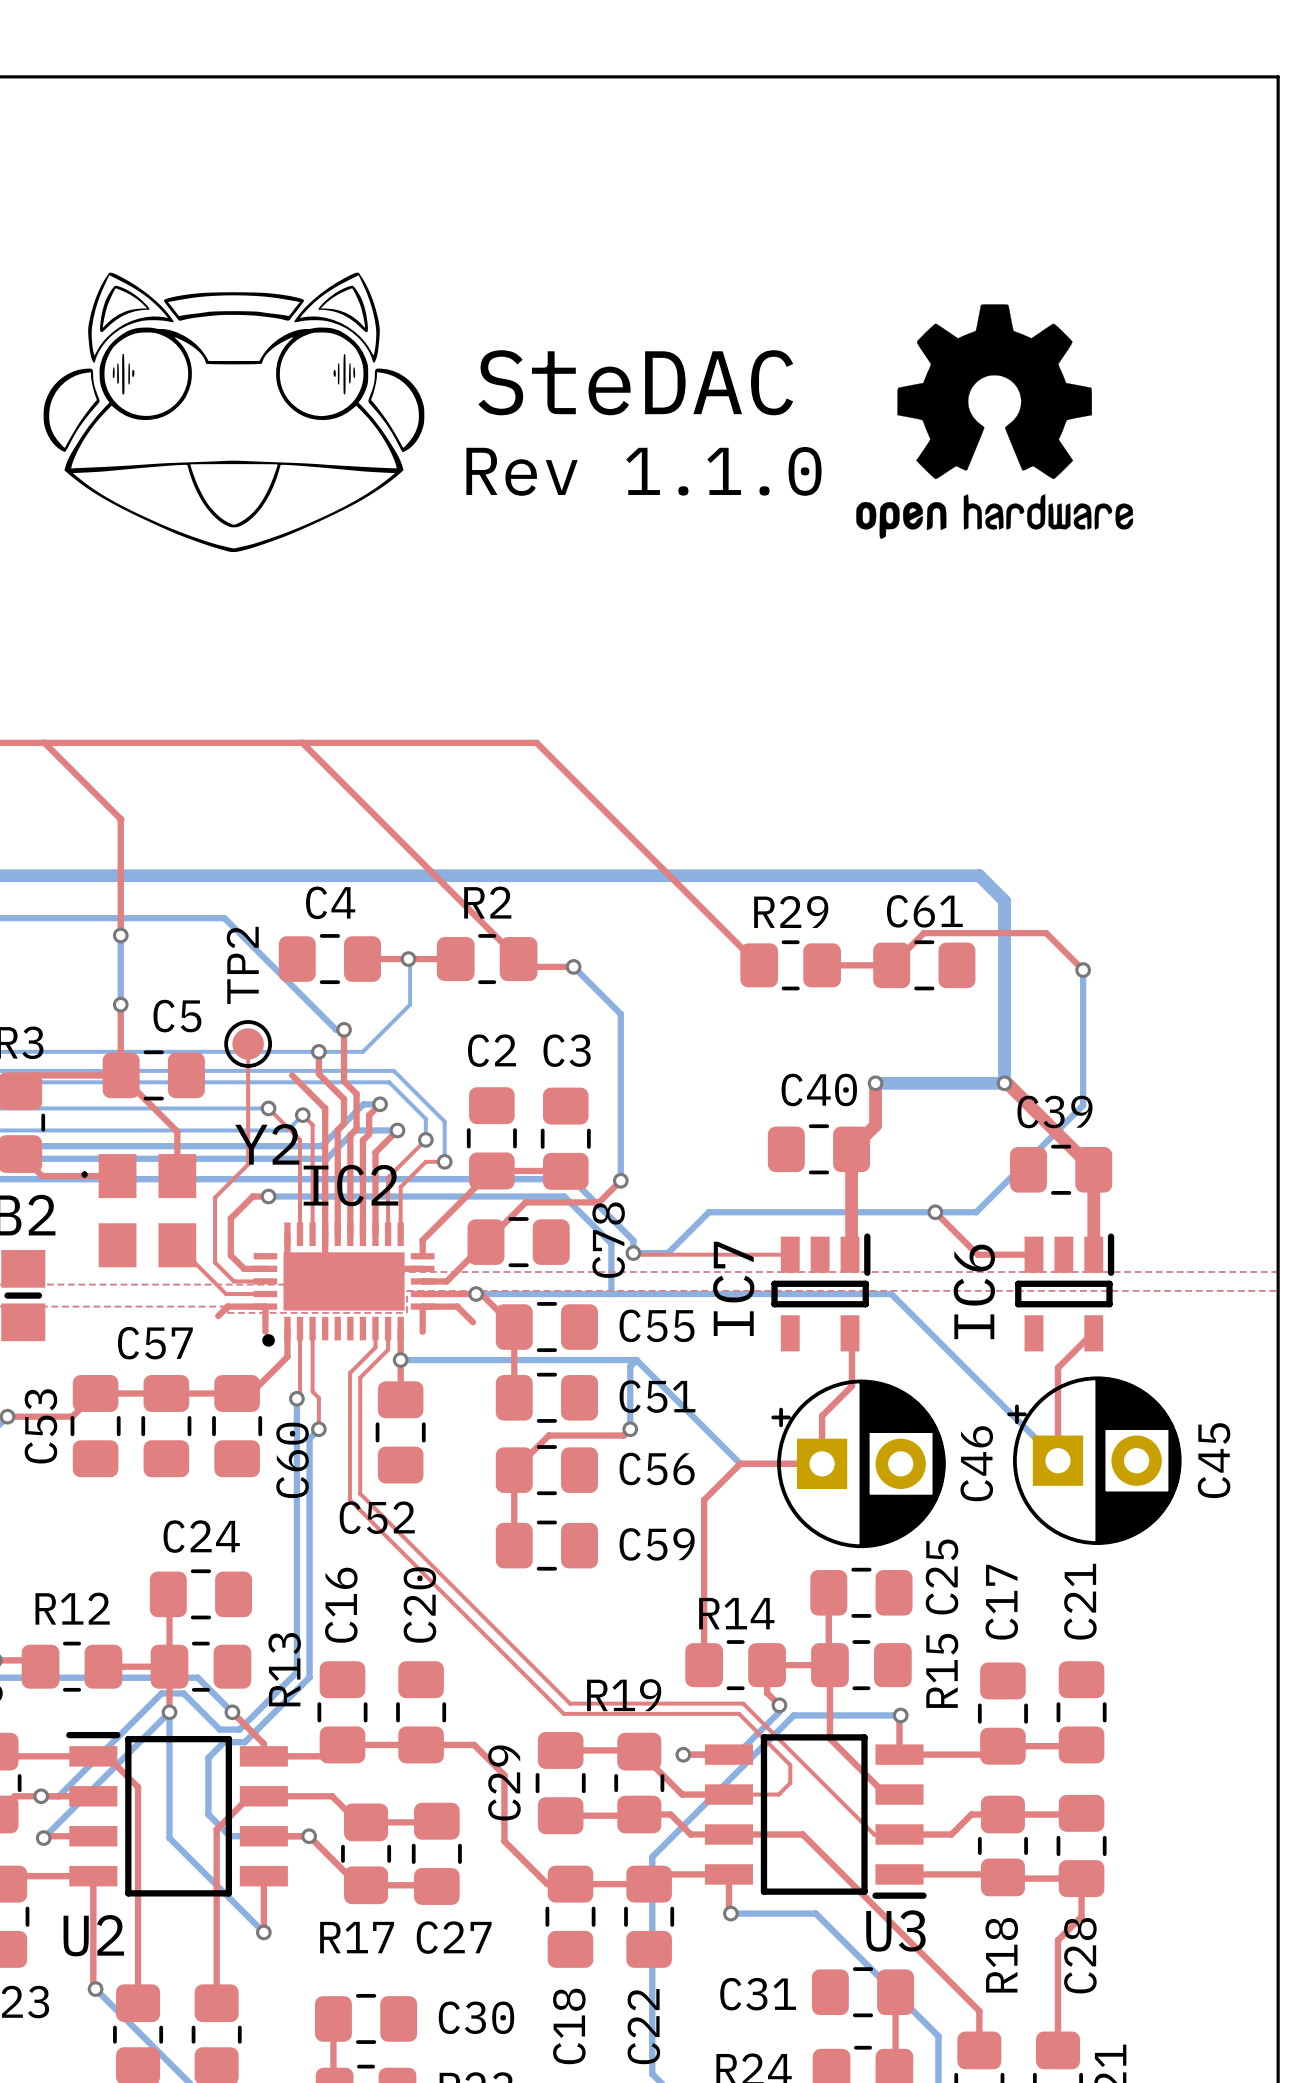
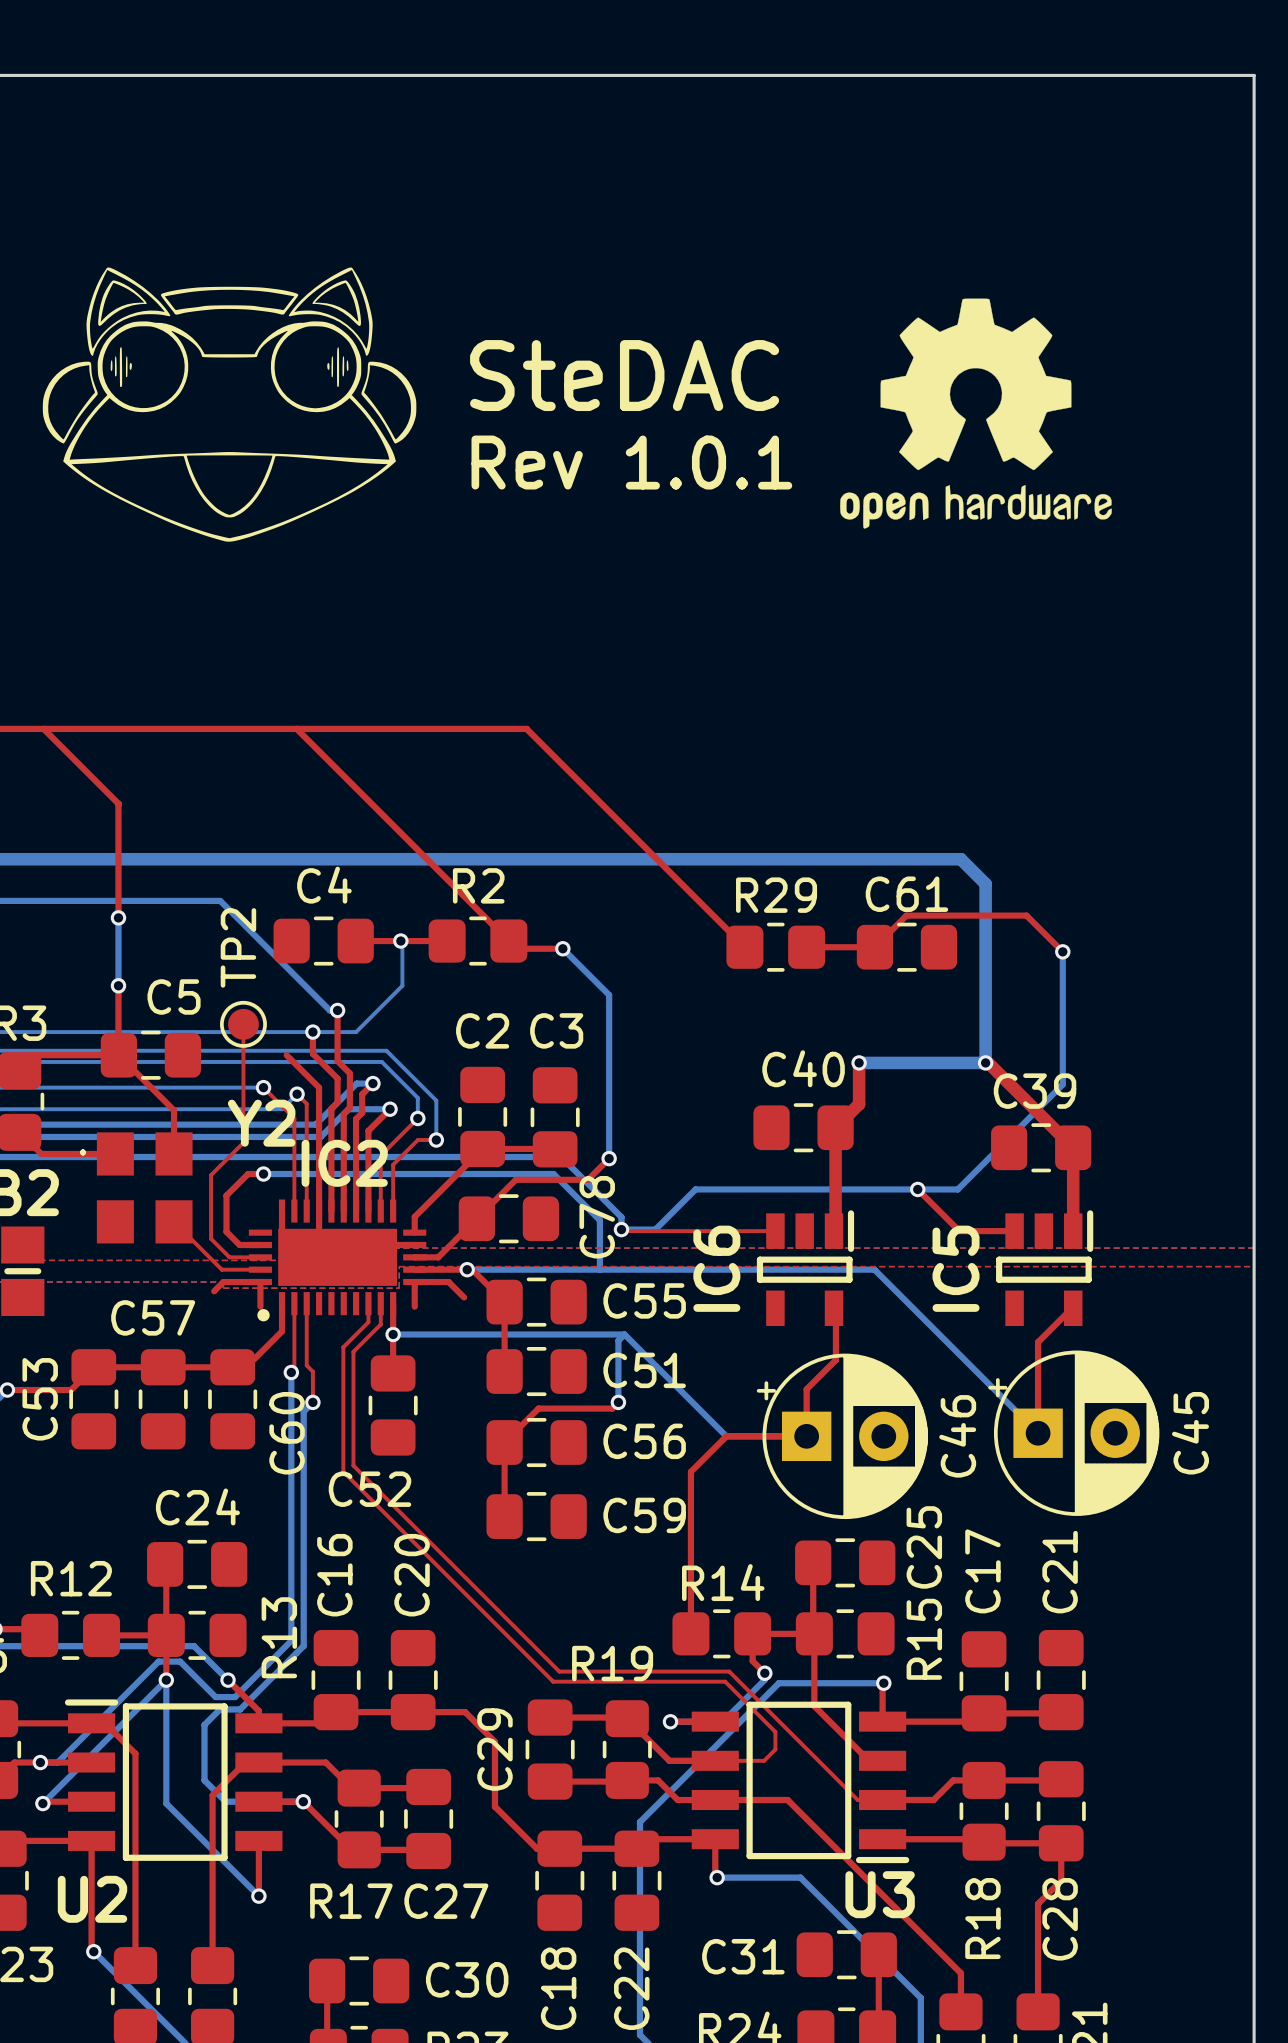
text: Rev 1.1.0 (643, 471) -> Rev 1.0.1 (631, 462)
IC7 name: IC7 (733, 1288) -> IC6 (716, 1268)
IC6 name: IC6 (974, 1291) -> IC5 (956, 1268)

